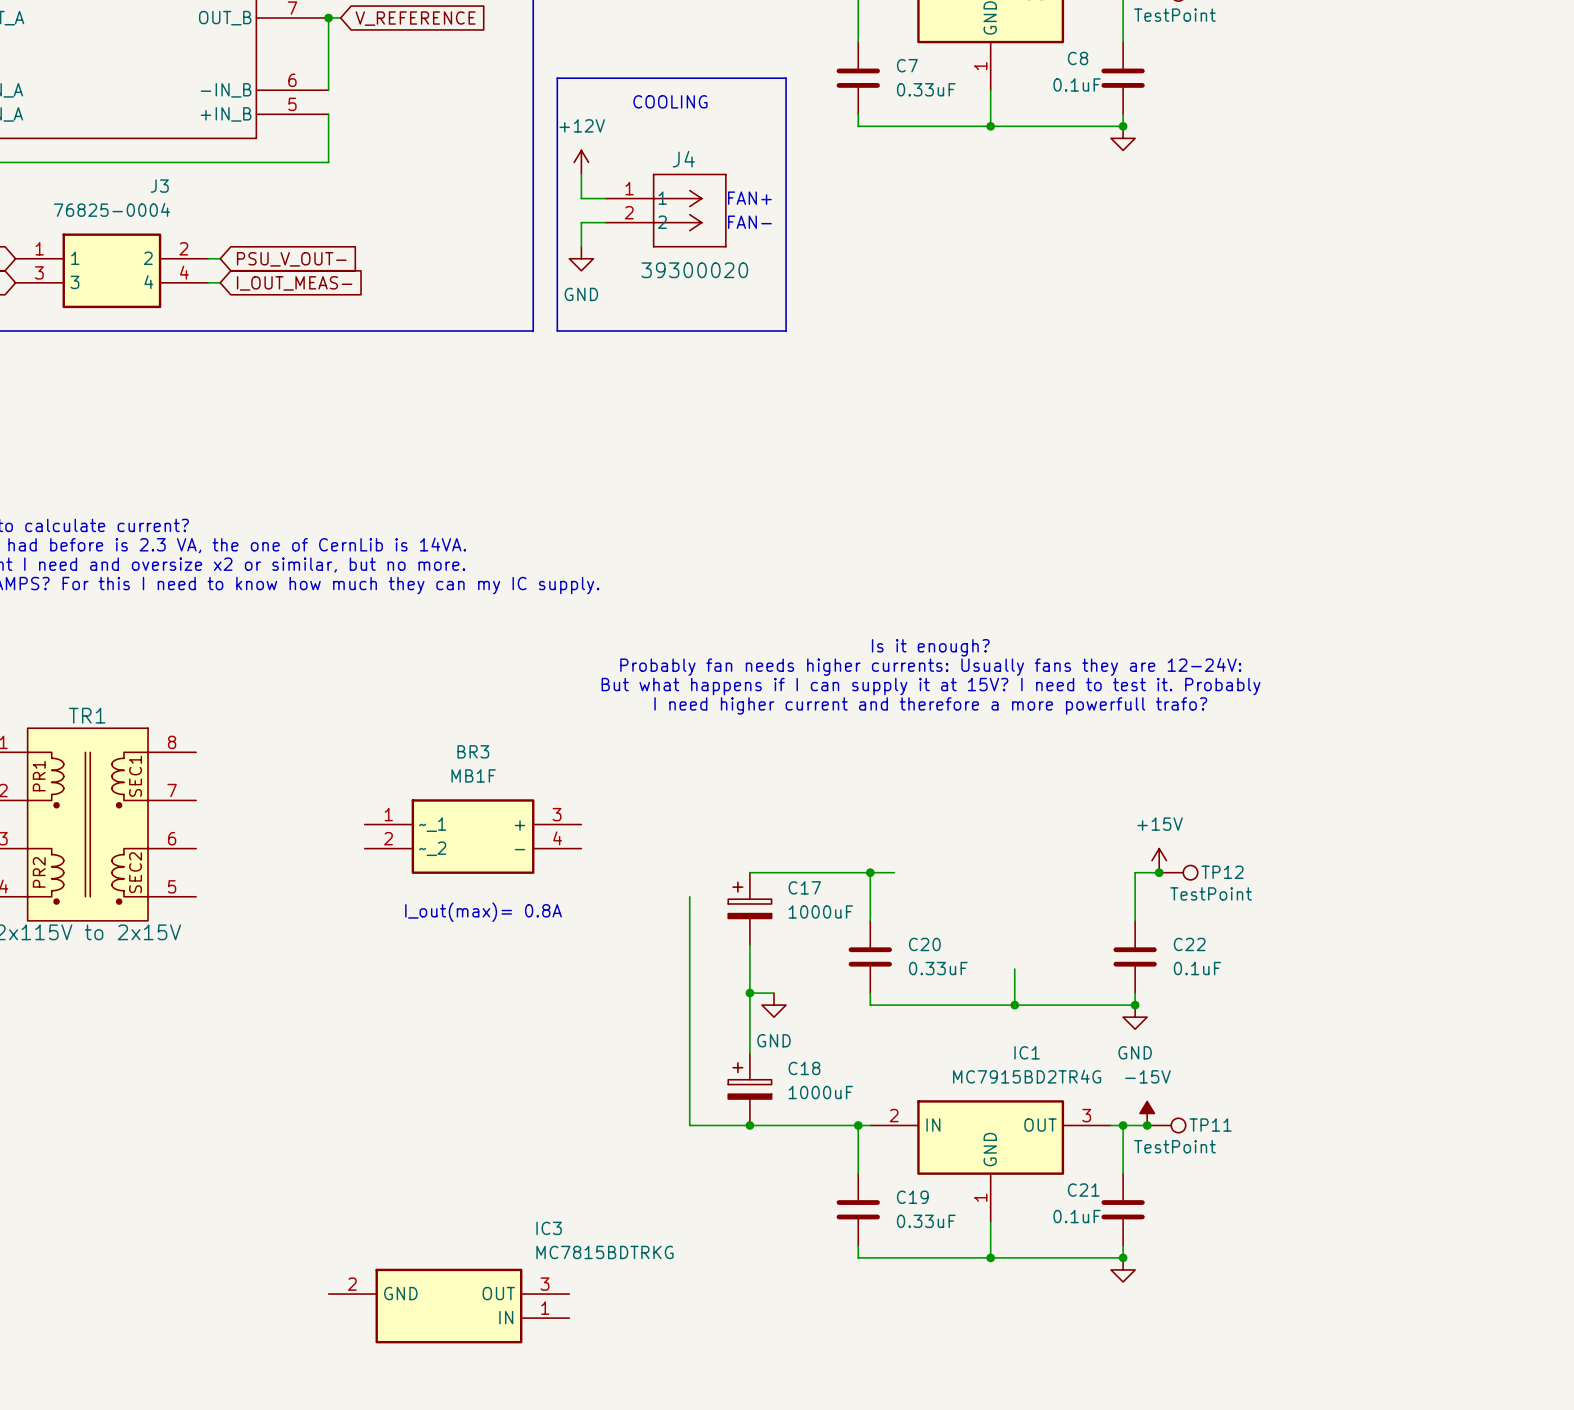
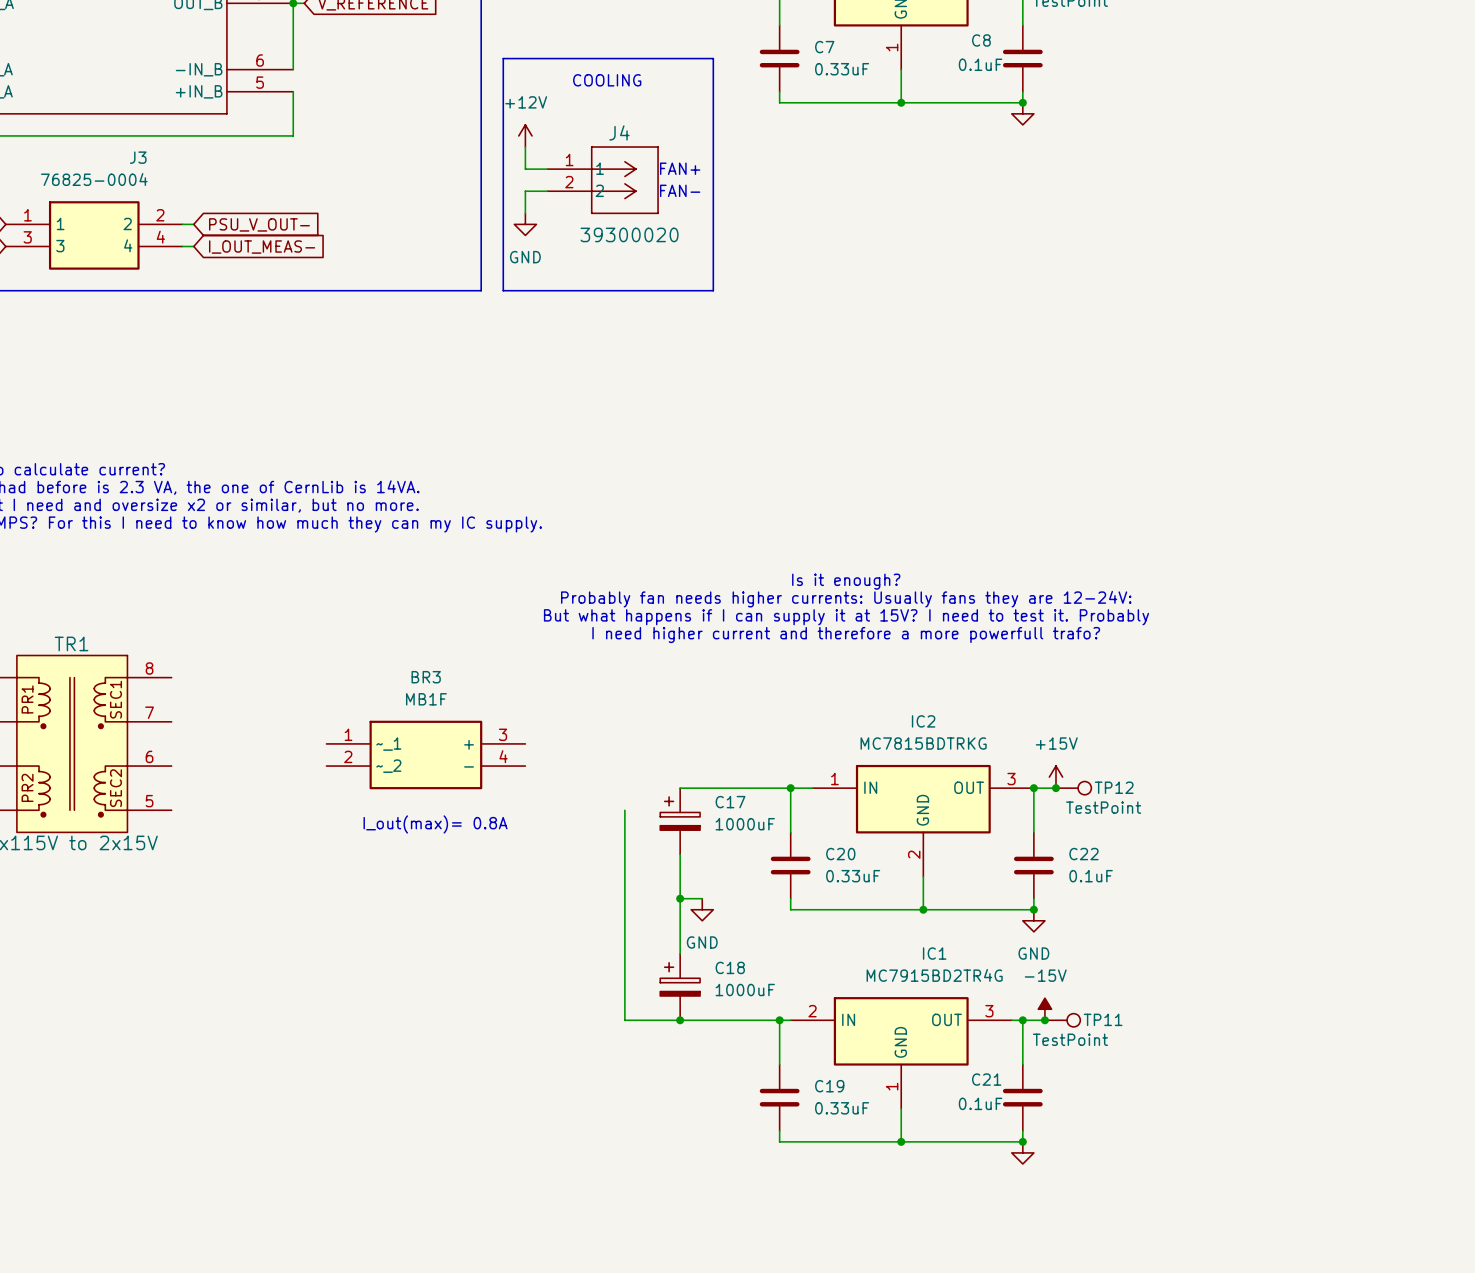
junction: none -> (1033, 788)
IC2: none -> MC7815BDTRKG (923, 820)
IC3: MC7815BDTRKG (448, 1306) -> none

